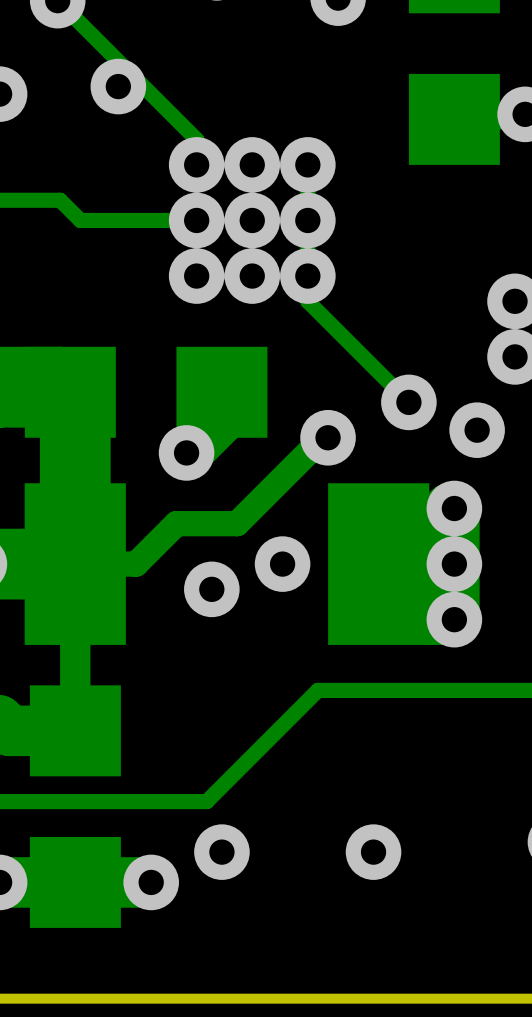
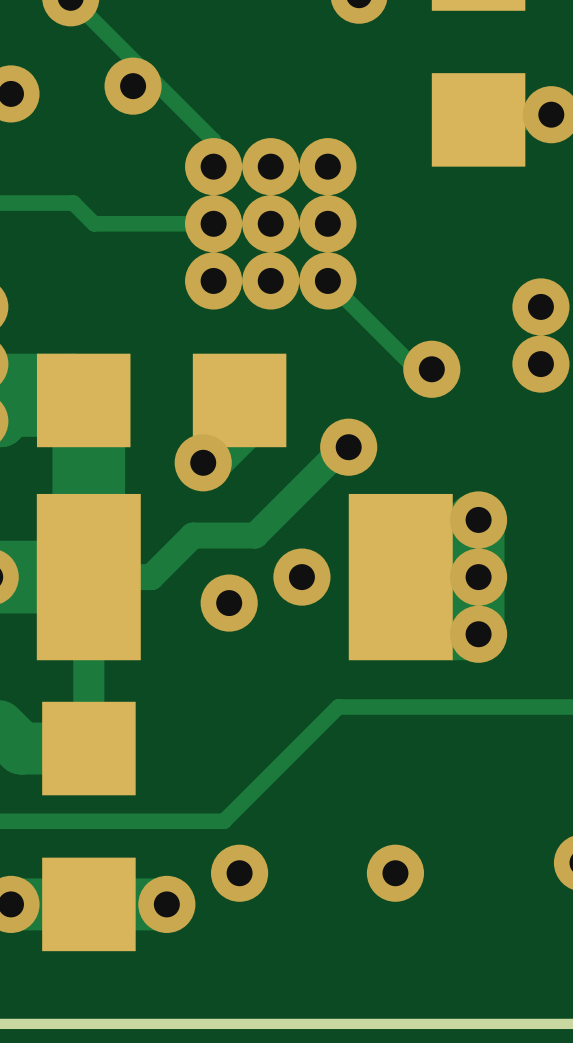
track: (307, 164) (307, 301) (408, 402) -> none
track: none -> (327, 280) (416, 369) (431, 369)
via position: (408, 402) -> (431, 369)
via: (477, 430) -> none

